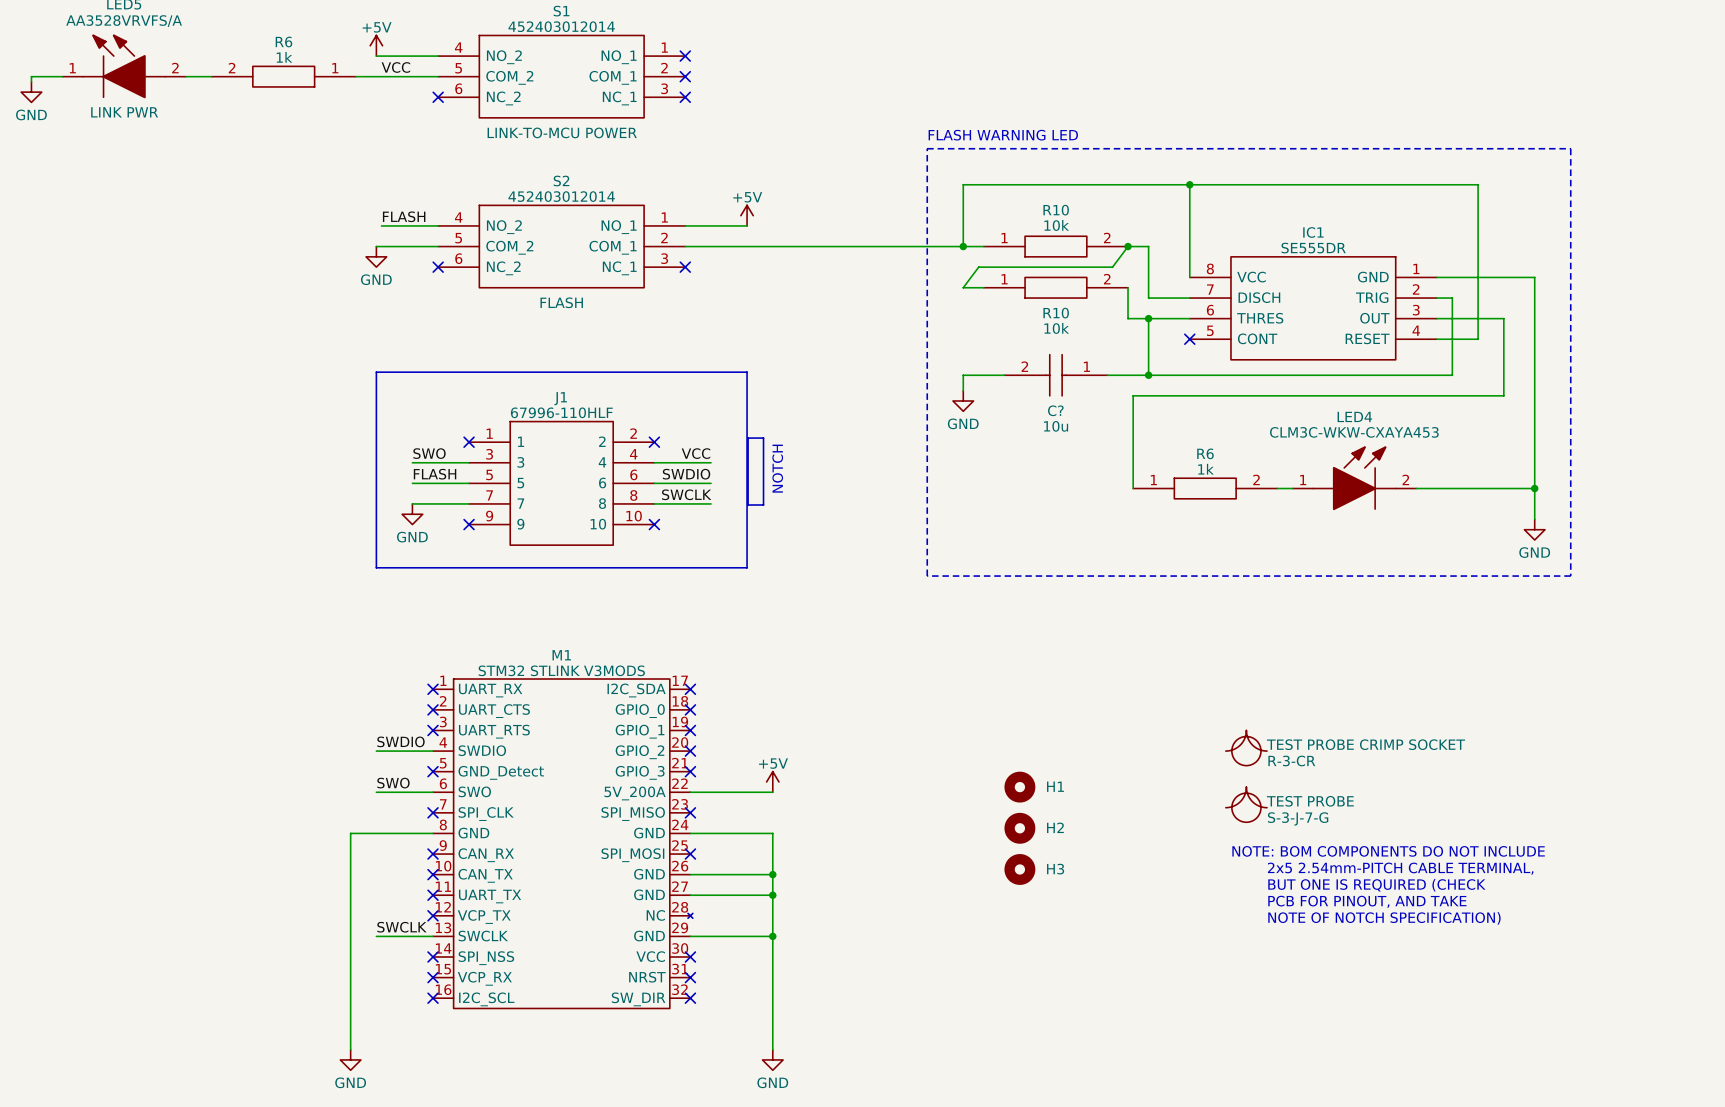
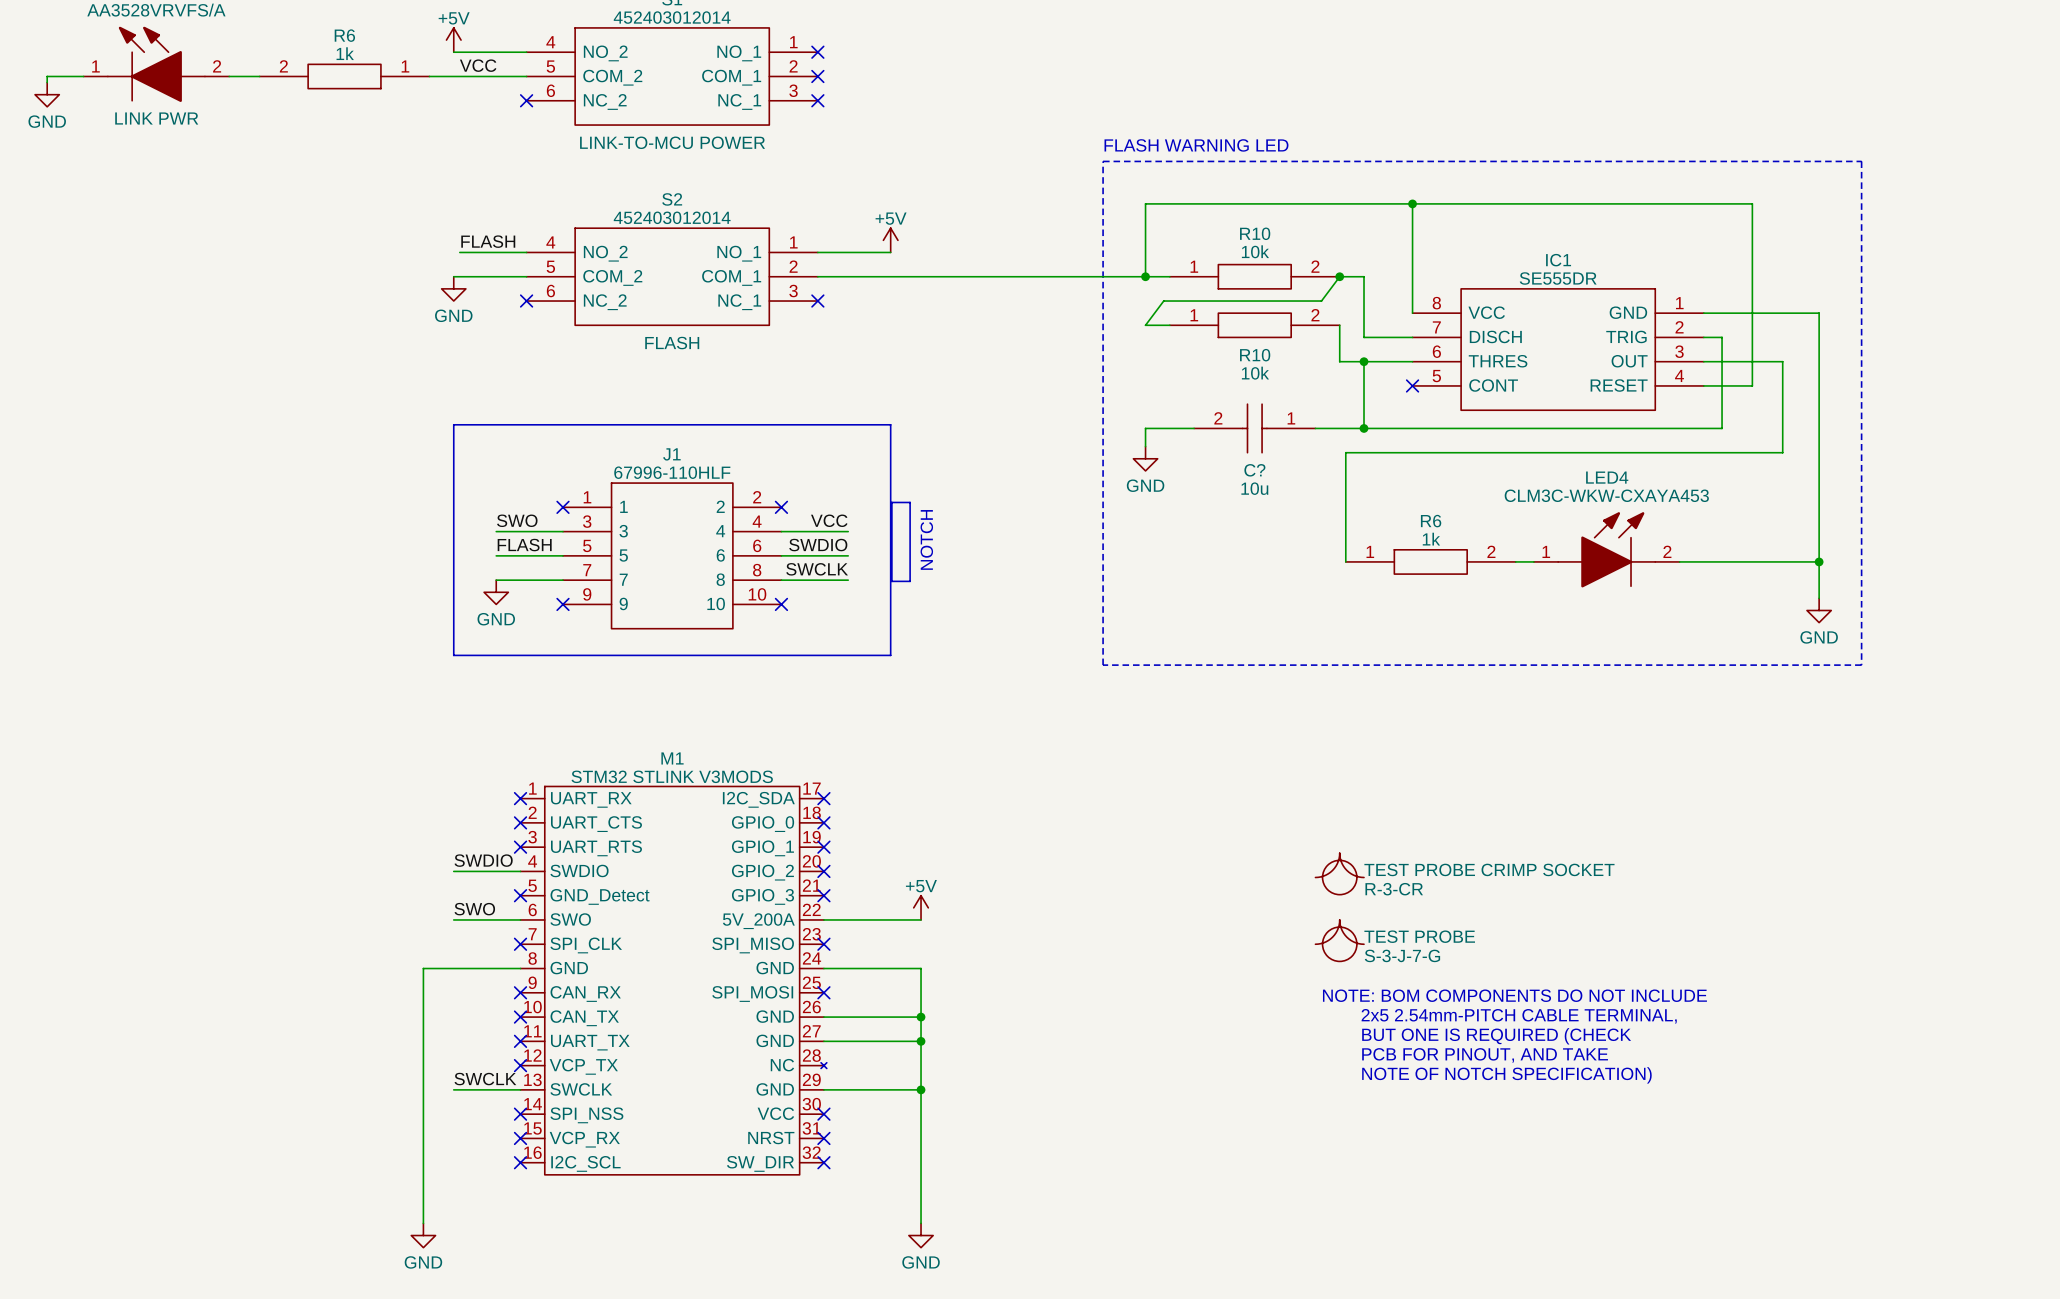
part position: (1246, 748) -> (1339, 873)
H1: (1019, 787) -> none
part position: (1246, 804) -> (1339, 940)
H2: (1019, 828) -> none
text position: NOTE: BOM COMPONENTS DO NOT INCLUDE (1388, 851) -> NOTE: BOM COMPONENTS DO NOT INCLUDE (1514, 995)
text position: 2x5 2.54mm-PITCH CABLE TERMINAL, (1400, 868) -> 2x5 2.54mm-PITCH CABLE TERMINAL, (1519, 1016)
H3: (1019, 869) -> none
text position: BUT ONE IS REQUIRED (CHECK (1376, 885) -> BUT ONE IS REQUIRED (CHECK (1496, 1036)
text position: PCB FOR PINOUT, AND TAKE (1367, 901) -> PCB FOR PINOUT, AND TAKE (1485, 1055)
text position: NOTE OF NOTCH SPECIFICATION) (1384, 918) -> NOTE OF NOTCH SPECIFICATION) (1506, 1075)

